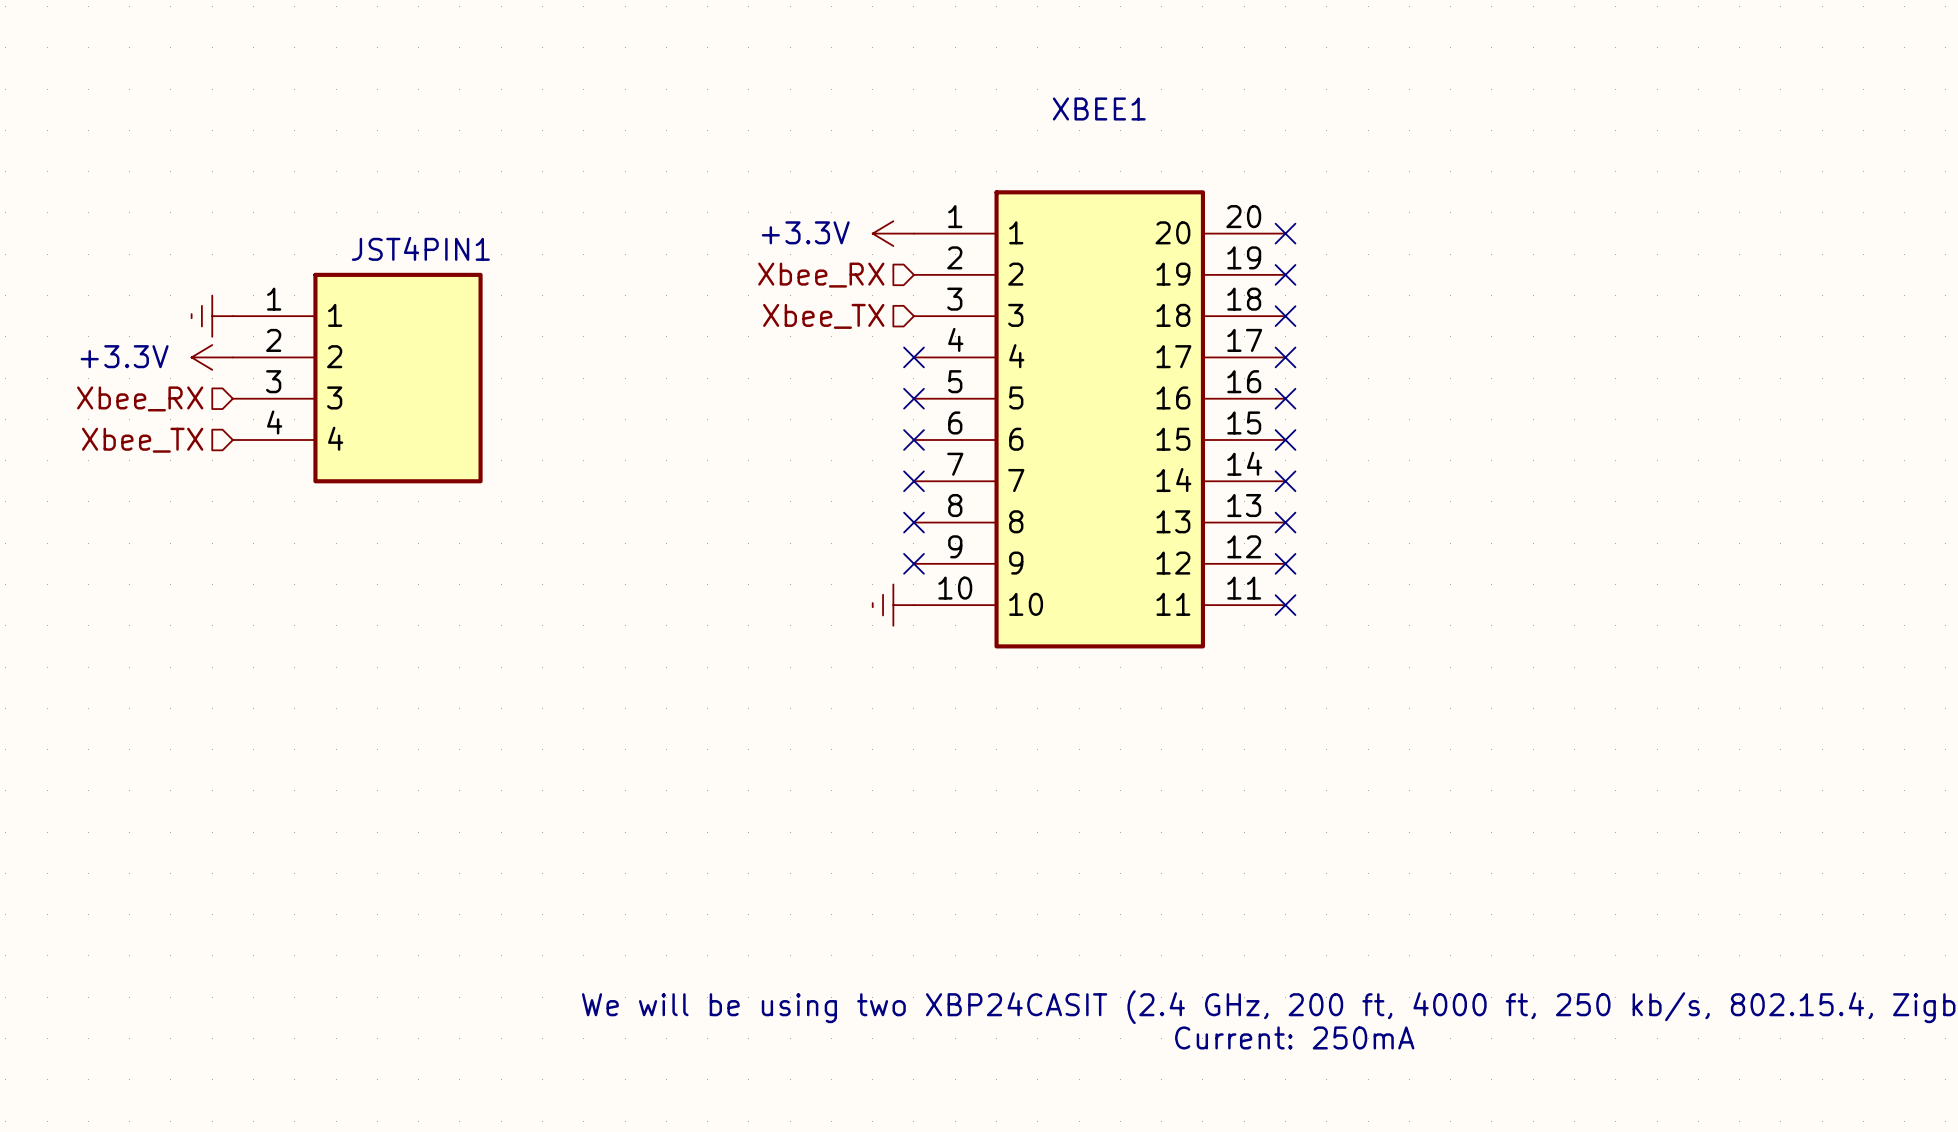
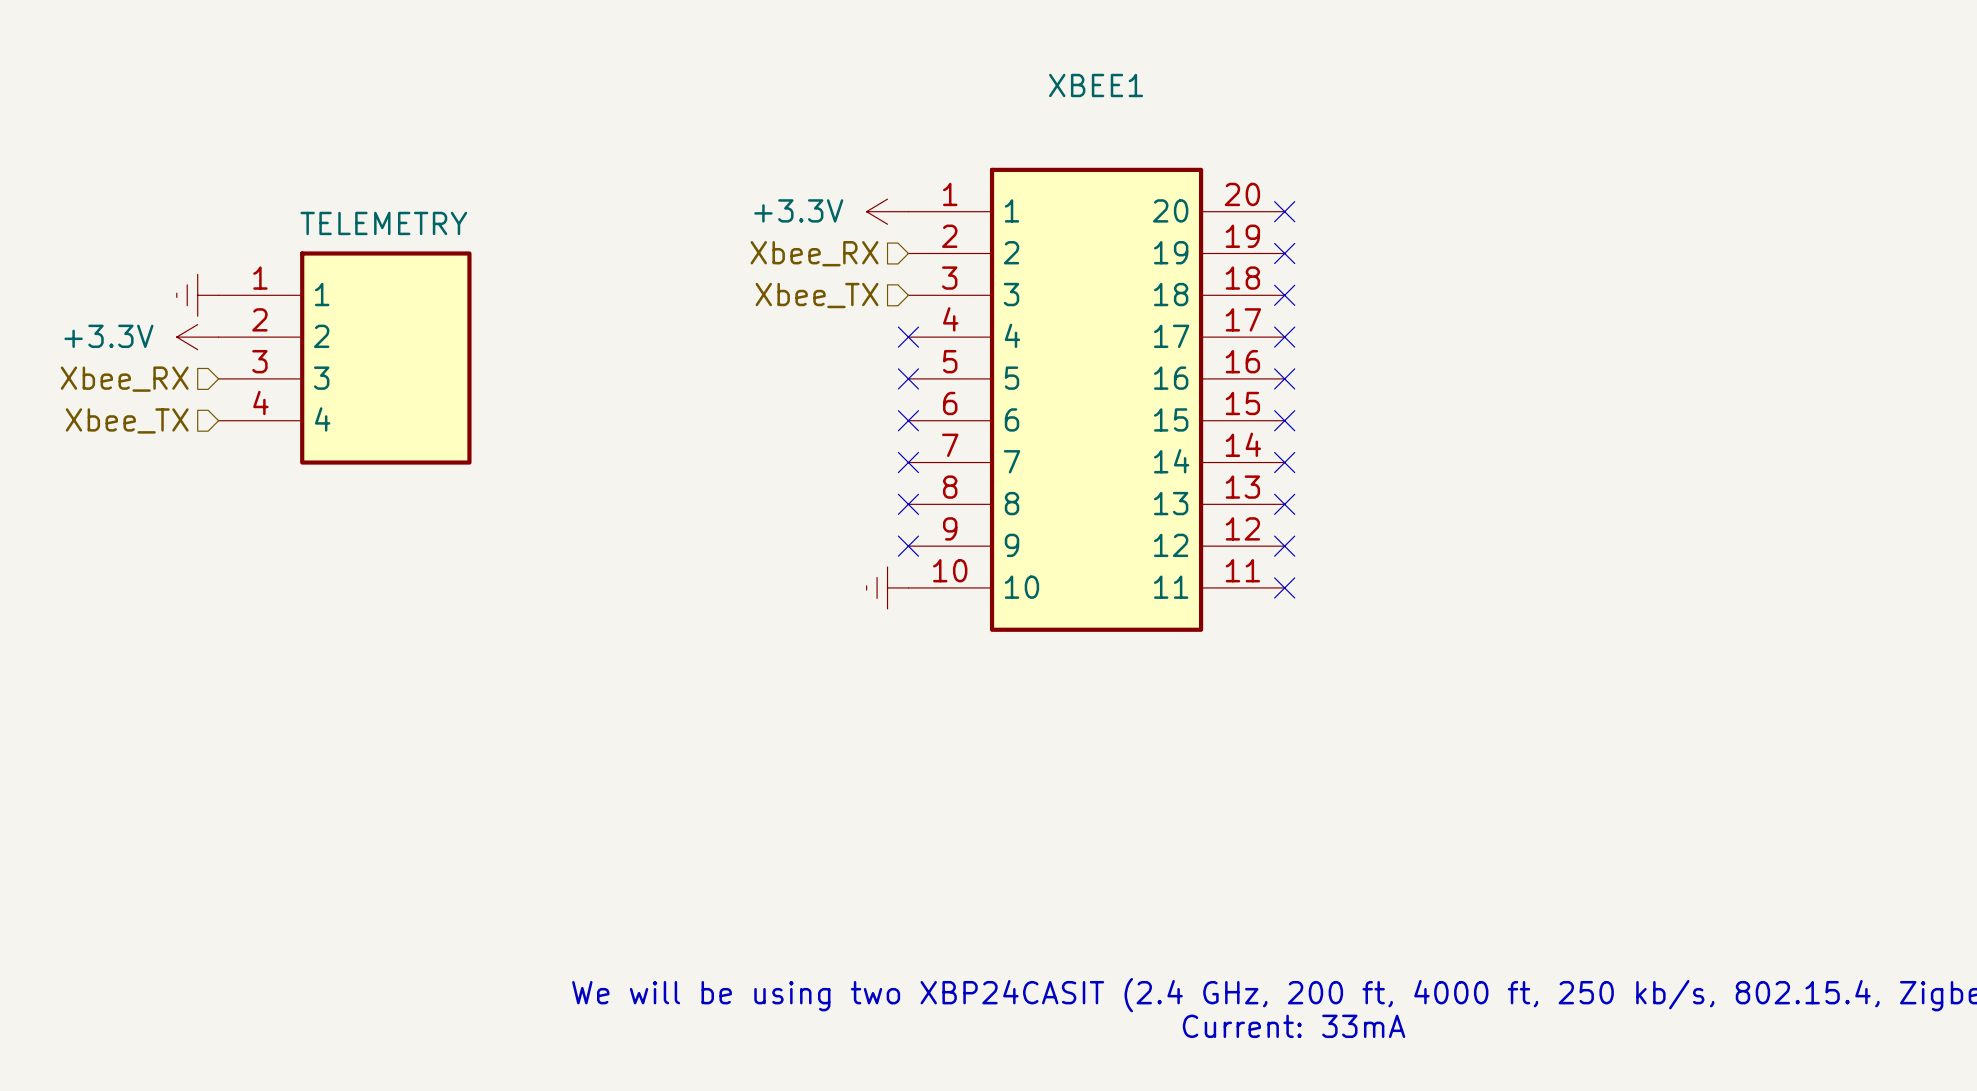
JST4PIN1 value: none -> TELEMETRY (383, 223)
JST4PIN1 name: JST4PIN1 (420, 248) -> none
text: Current: 250mA (1294, 1037) -> Current: 33mA (1294, 1026)

